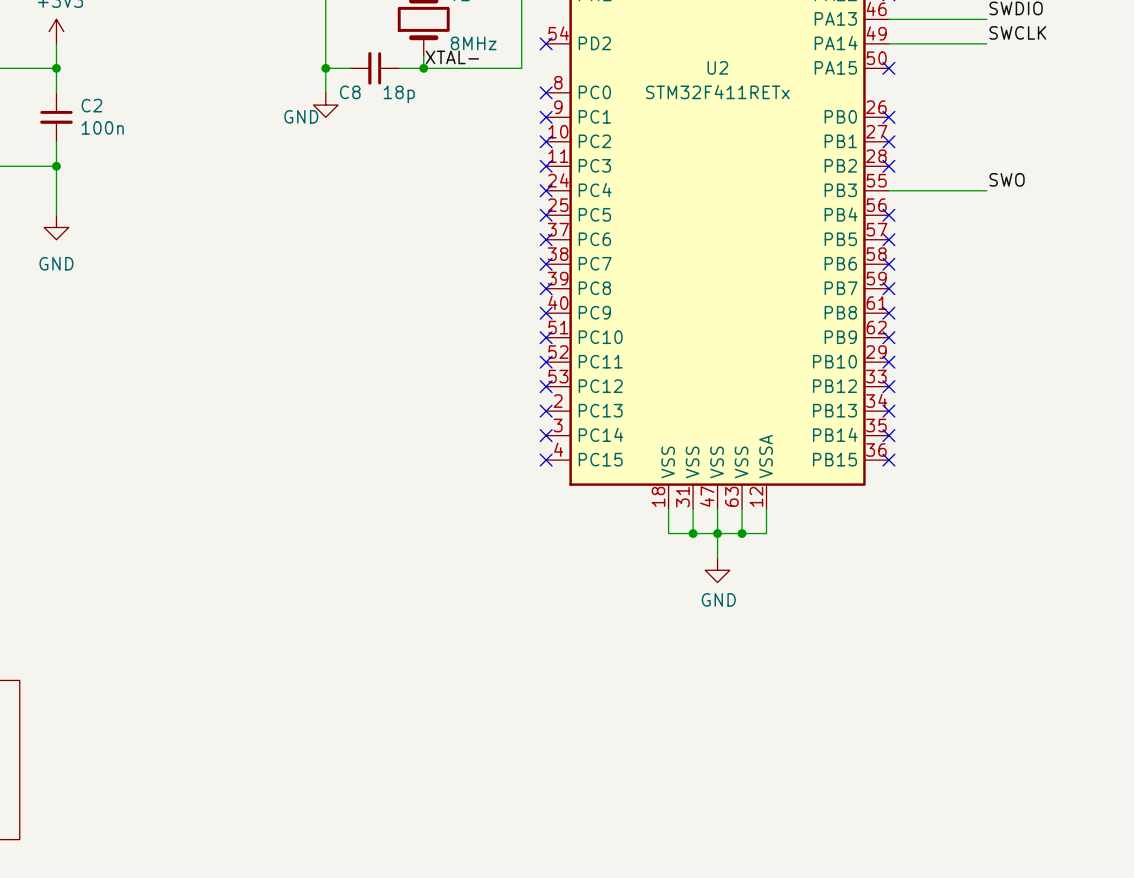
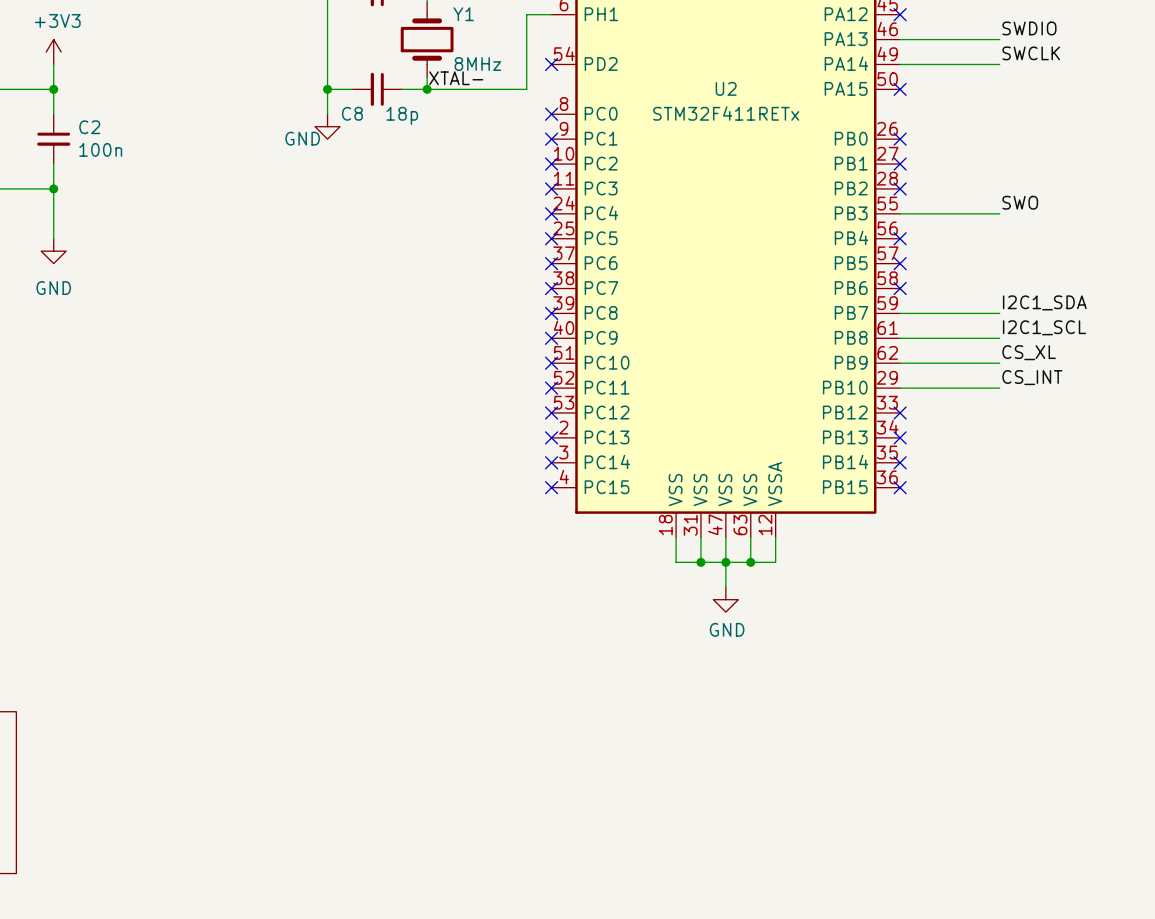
label: none -> I2C1_SDA (1044, 302)
wire: none -> (900, 313) (999, 313)
no-connect mark: (888, 288) -> none
label: none -> I2C1_SCL (1044, 327)
wire: none -> (900, 338) (999, 338)
no-connect mark: (888, 313) -> none
label: none -> CS_XL (1029, 352)
wire: none -> (900, 363) (999, 363)
no-connect mark: (888, 337) -> none
label: none -> CS_INT (1032, 377)
wire: none -> (900, 388) (999, 388)
no-connect mark: (888, 362) -> none

